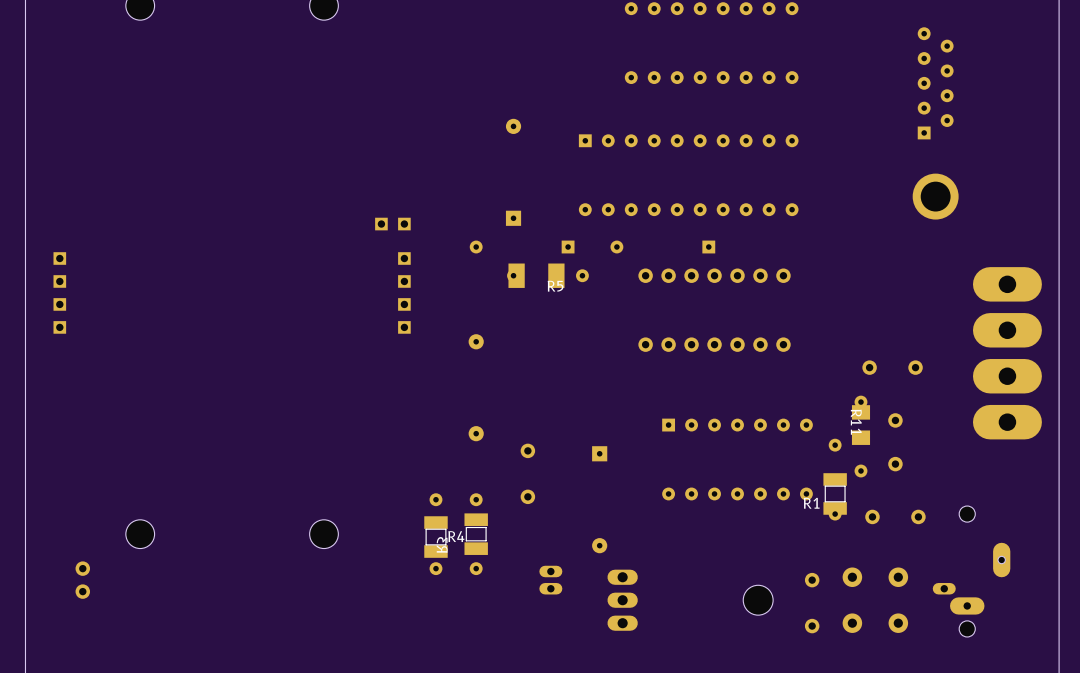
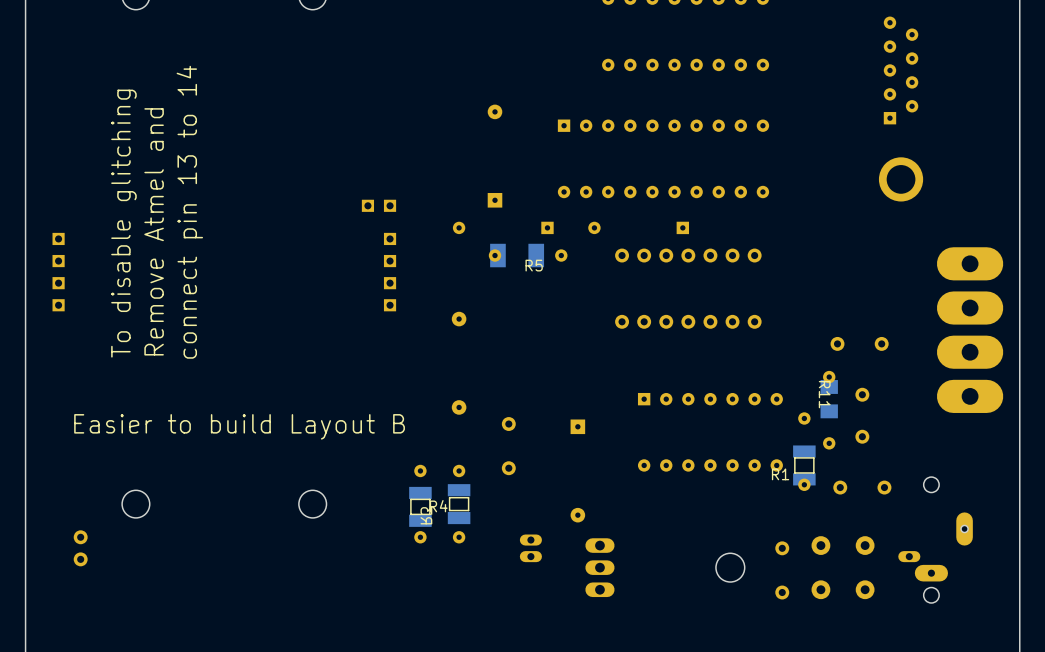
text: none -> connect pin 13 to 14 (189, 212)
text: none -> To disable glitching (123, 223)
text: none -> Remove Atmel and (154, 231)
text: none -> Easier to build Layout B (239, 426)

